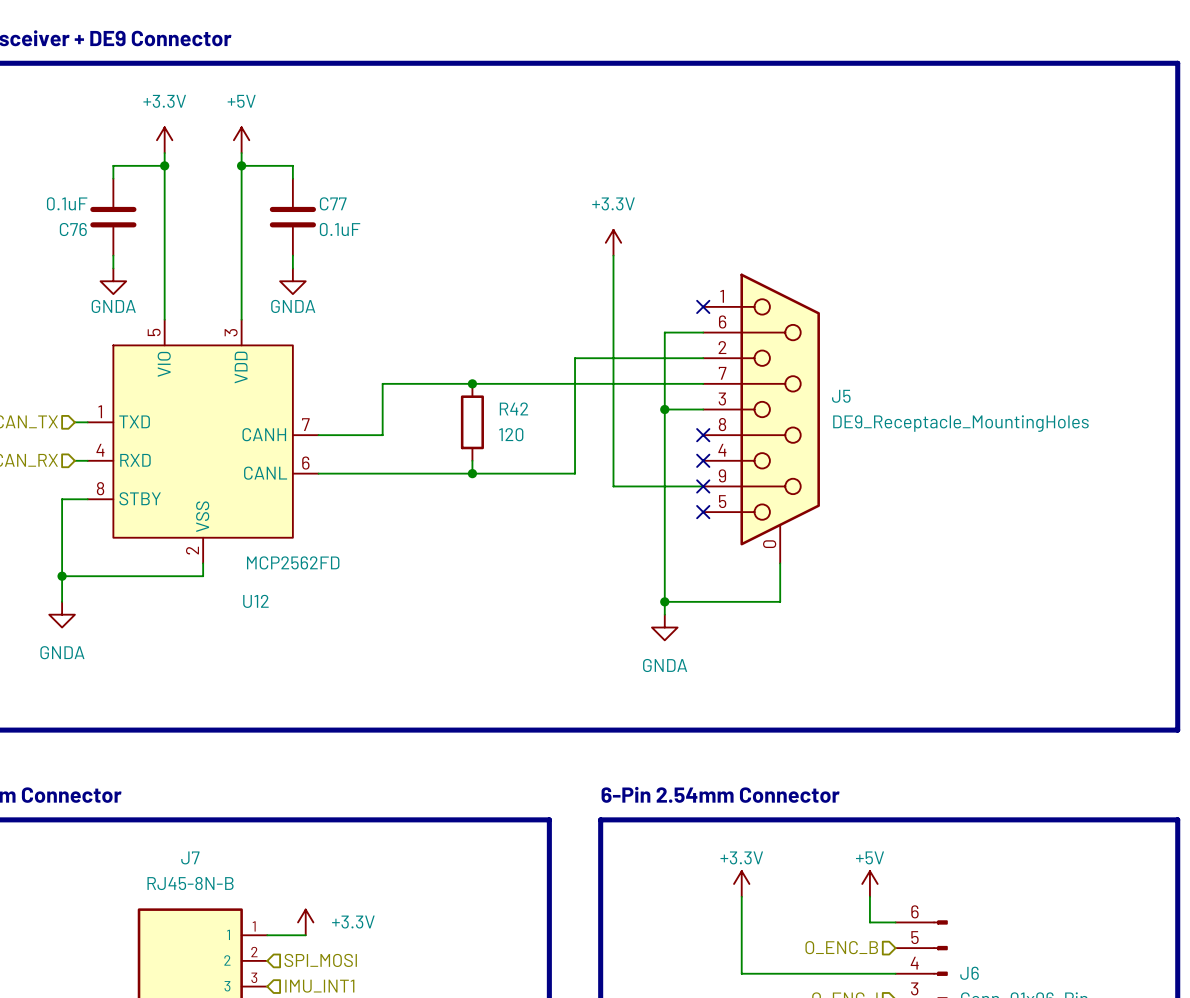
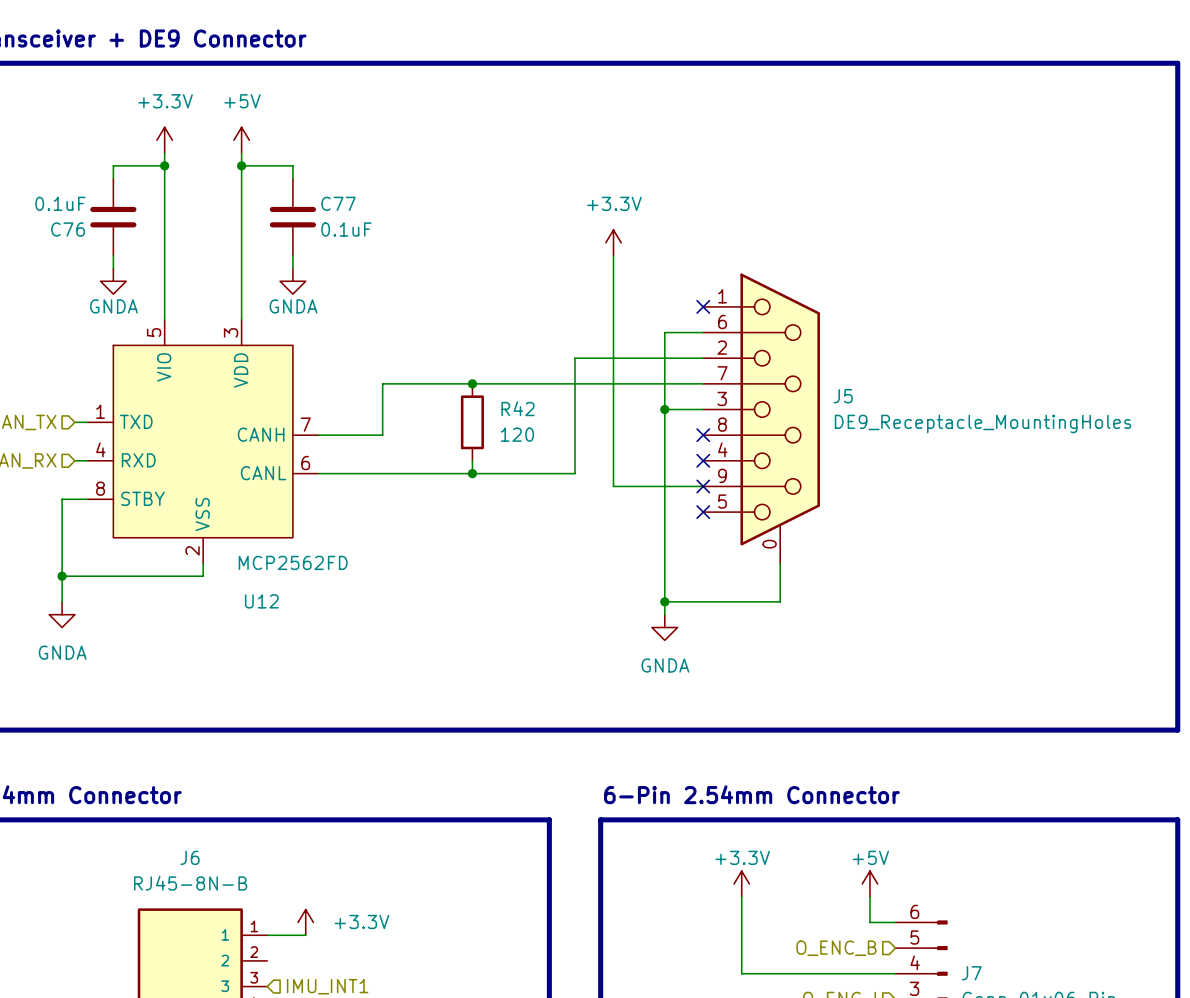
J7 name: J7 (190, 857) -> J6 (190, 857)
hierarchical label: SPI_MOSI (320, 960) -> none
J6 name: J6 (969, 973) -> J7 (971, 973)

